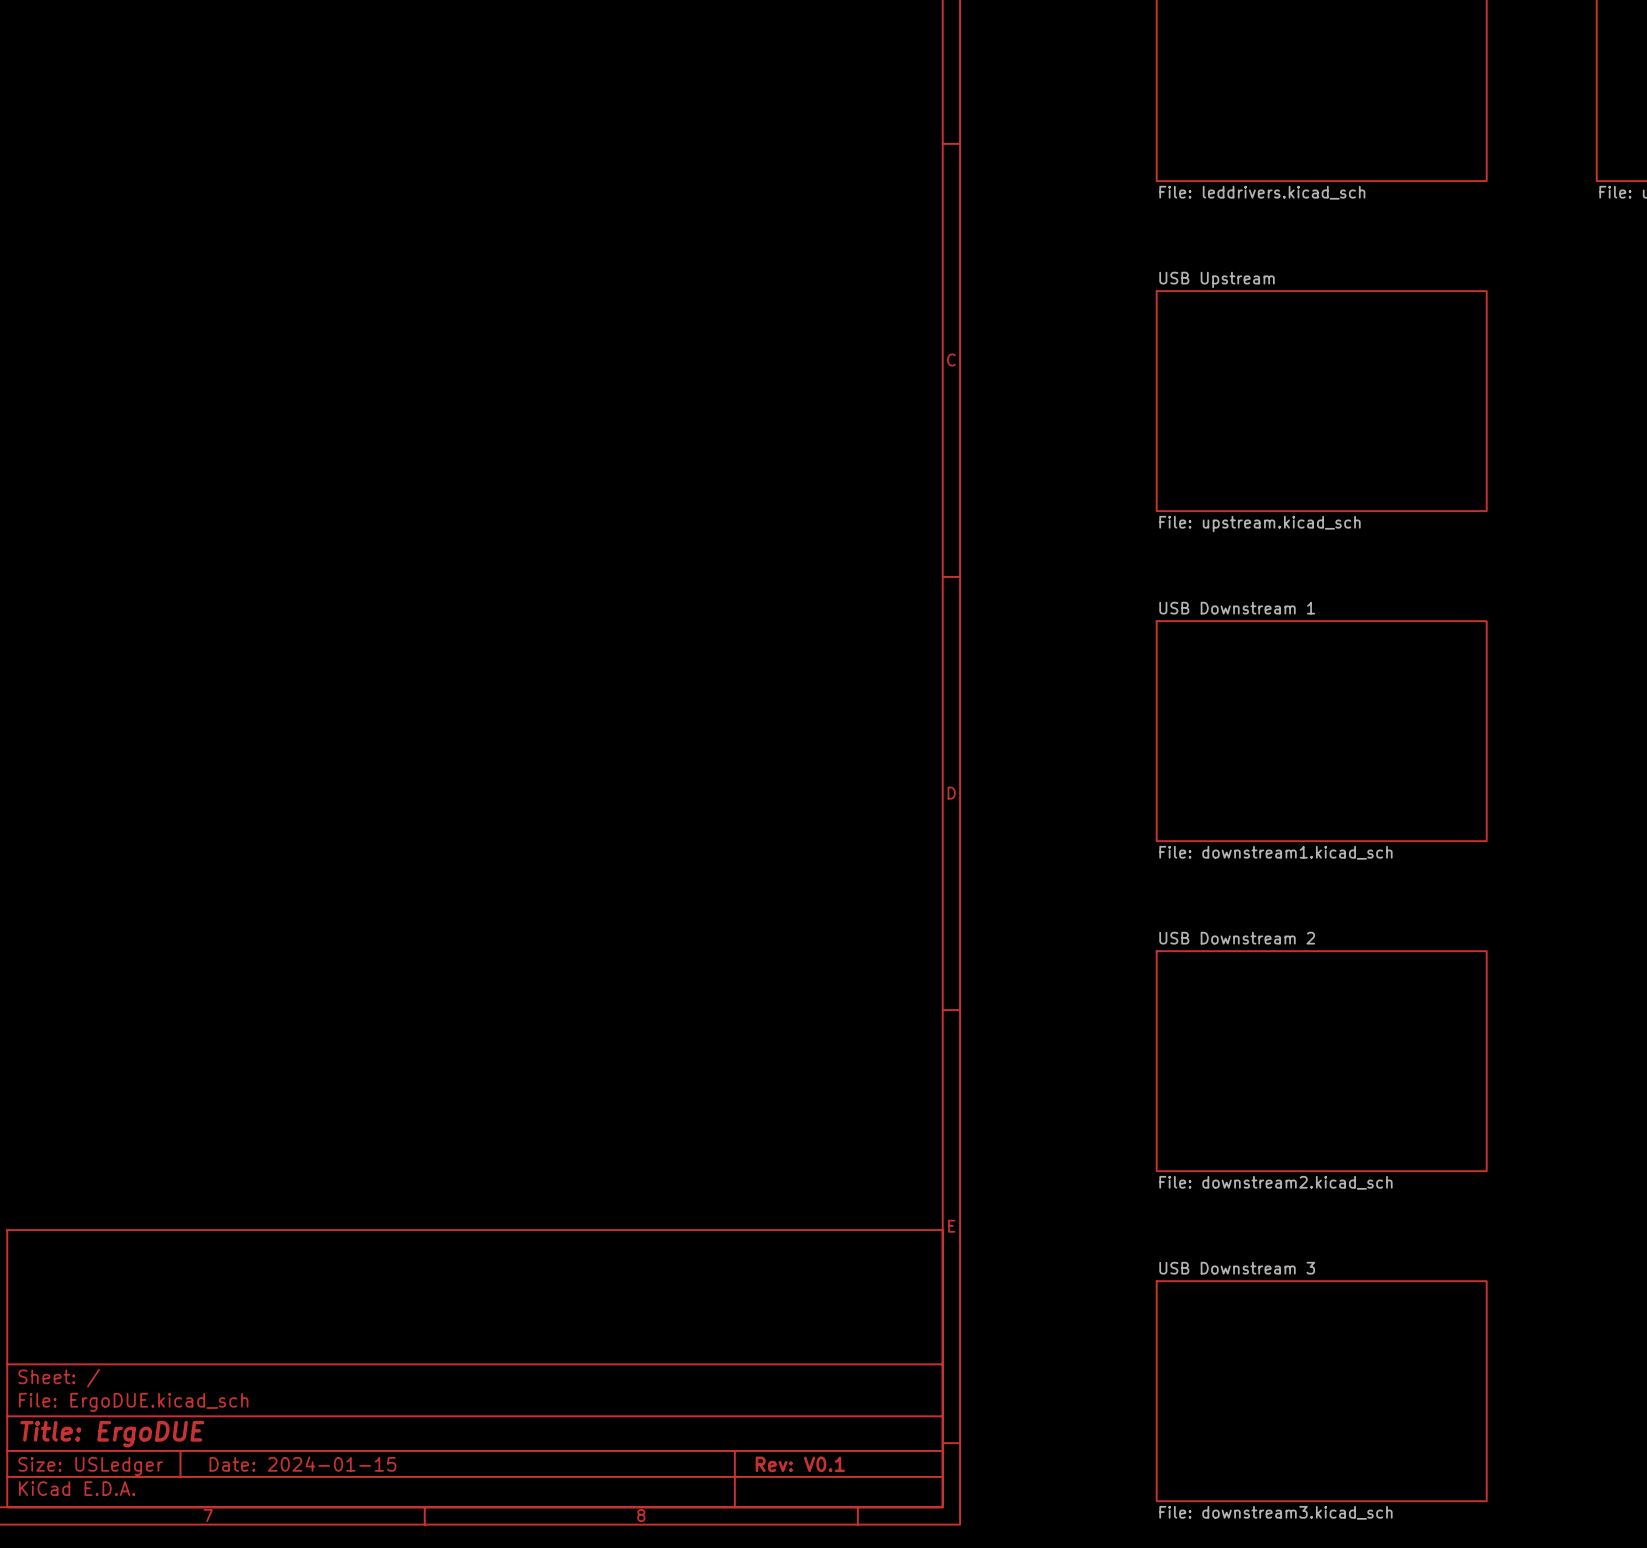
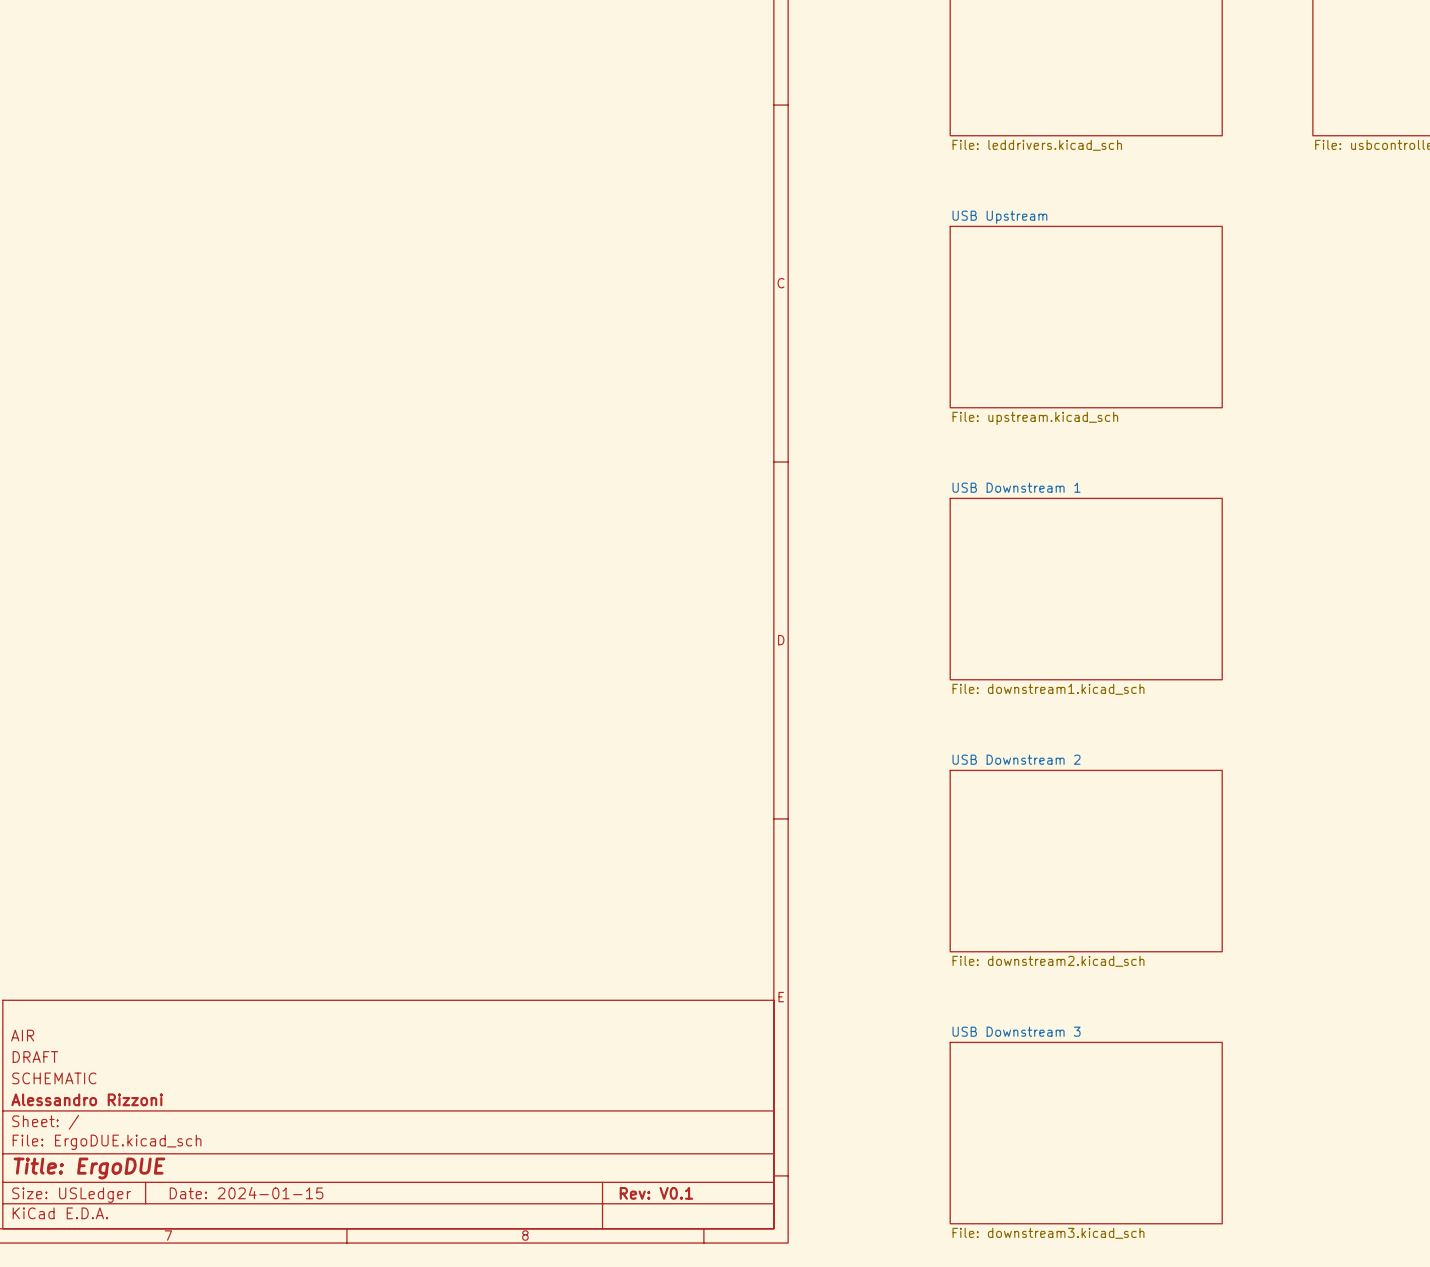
title block: none -> AIR (22, 1035)
title block: none -> DRAFT (35, 1057)
title block: none -> SCHEMATIC (54, 1078)
title block: none -> Alessandro Rizzoni (87, 1099)

